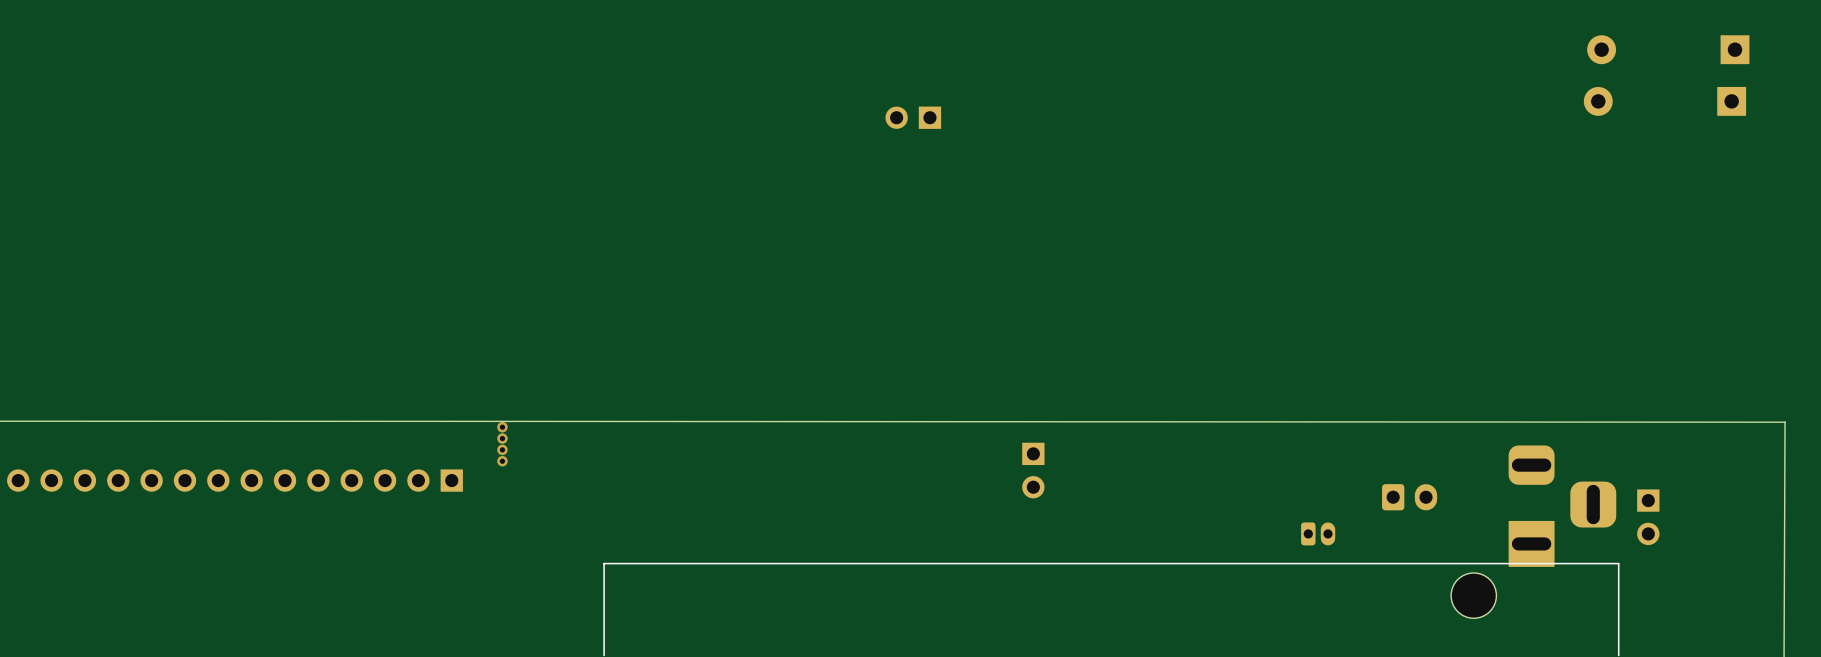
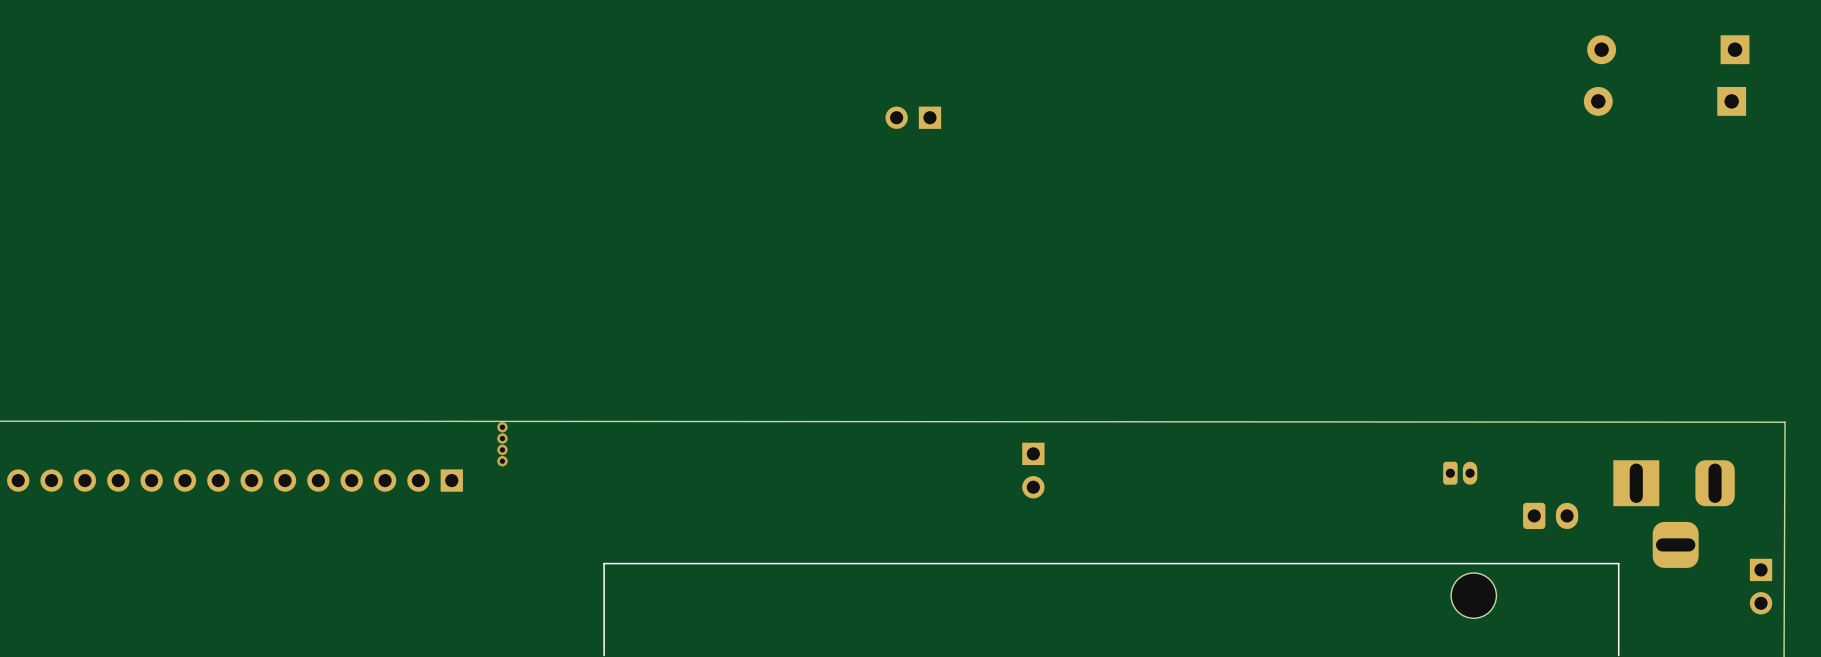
part position: (1409, 497) -> (1550, 515)
part rotation: 0° (1562, 506) -> 90° clockwise (1674, 514)
part position: (1562, 506) -> (1674, 514)
part position: (1648, 517) -> (1761, 586)
part position: (1318, 533) -> (1460, 473)

